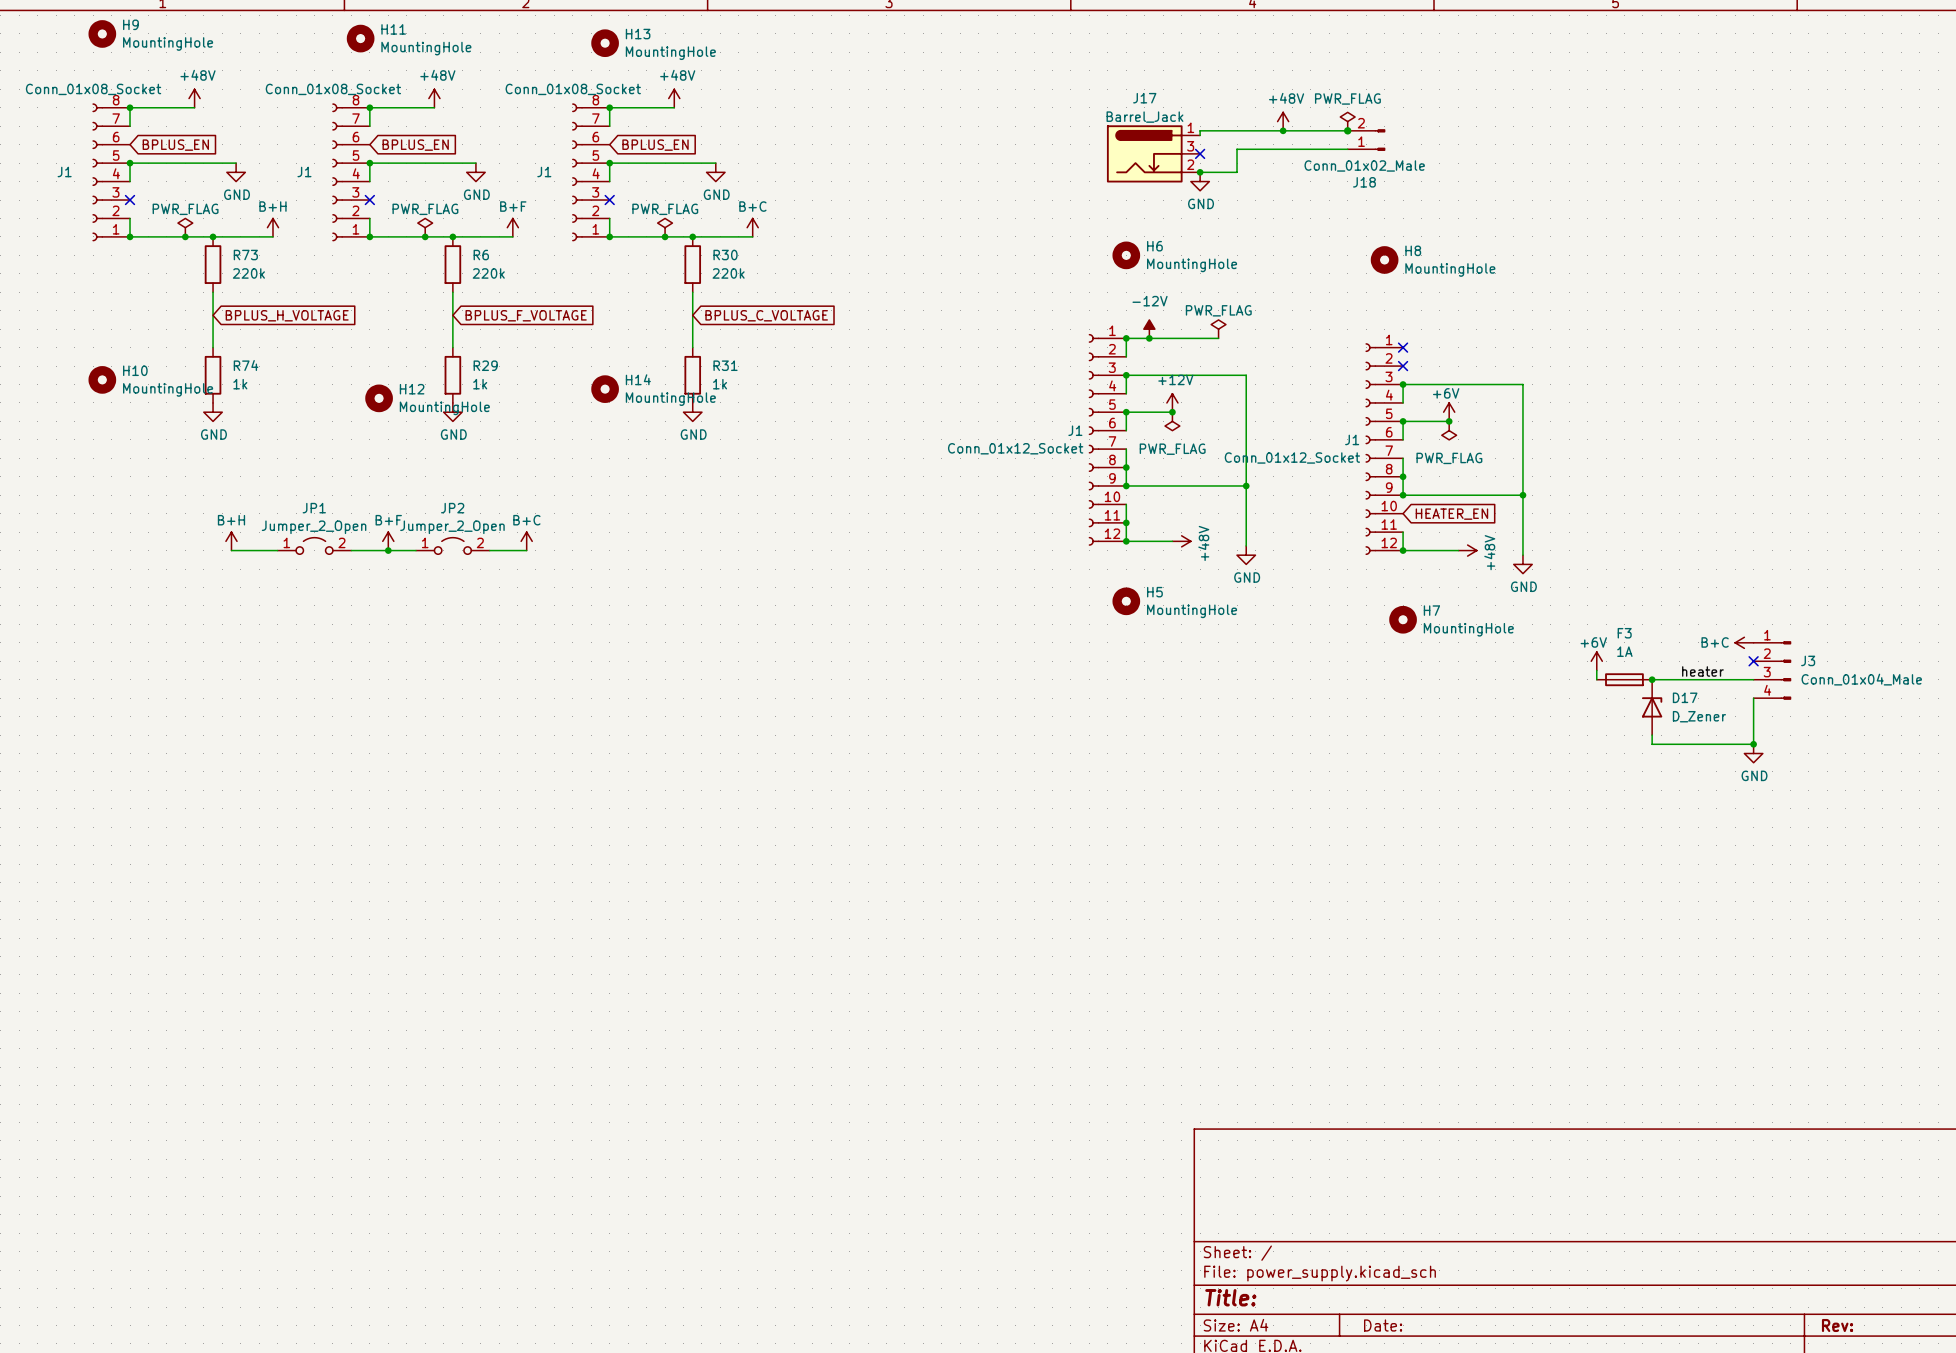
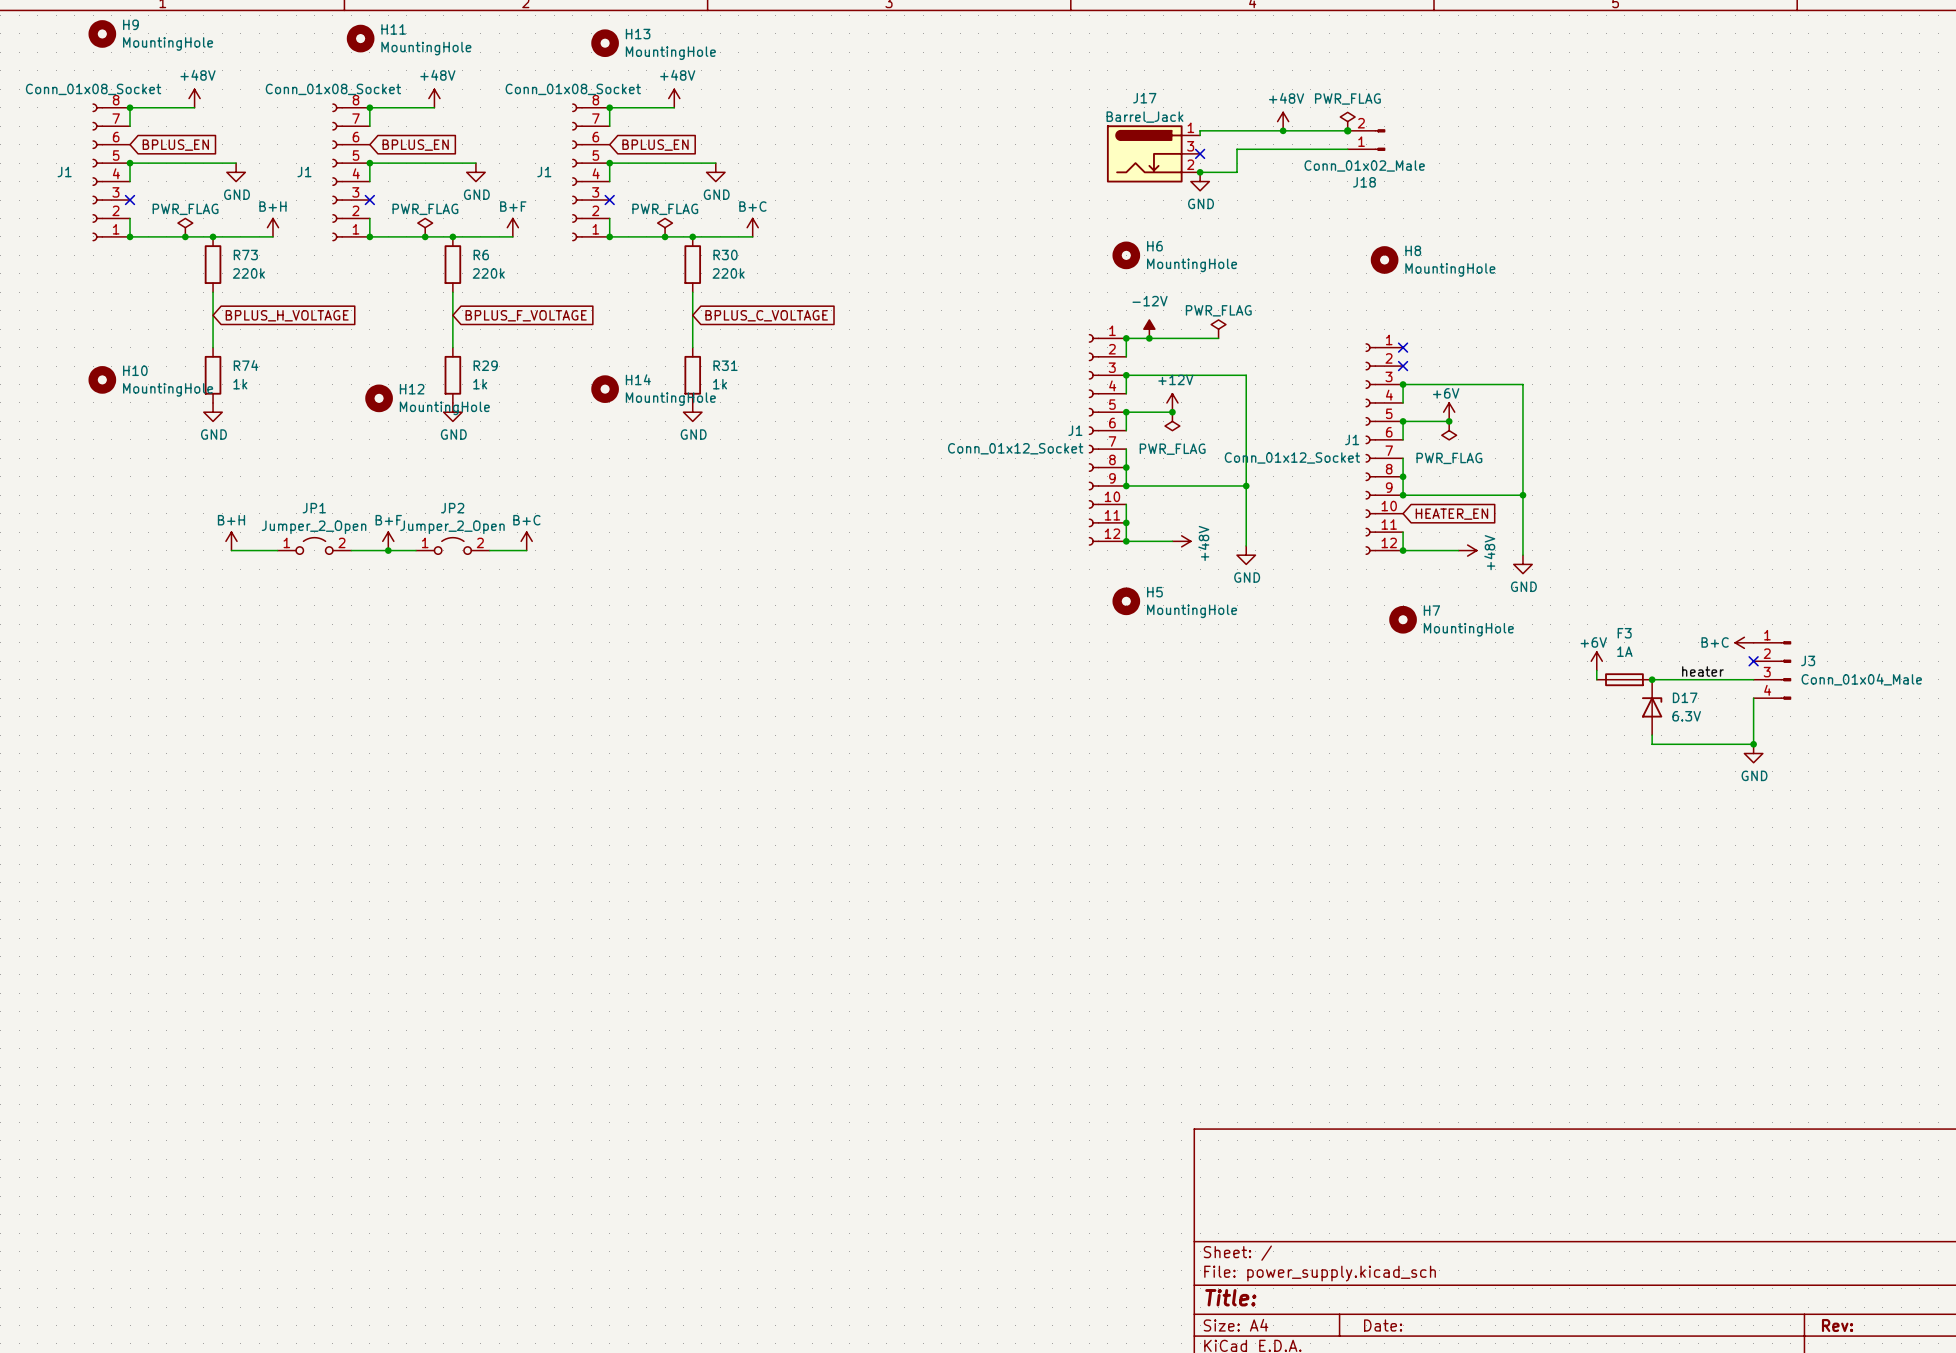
D17 value: D_Zener (1699, 716) -> 6.3V (1686, 716)

